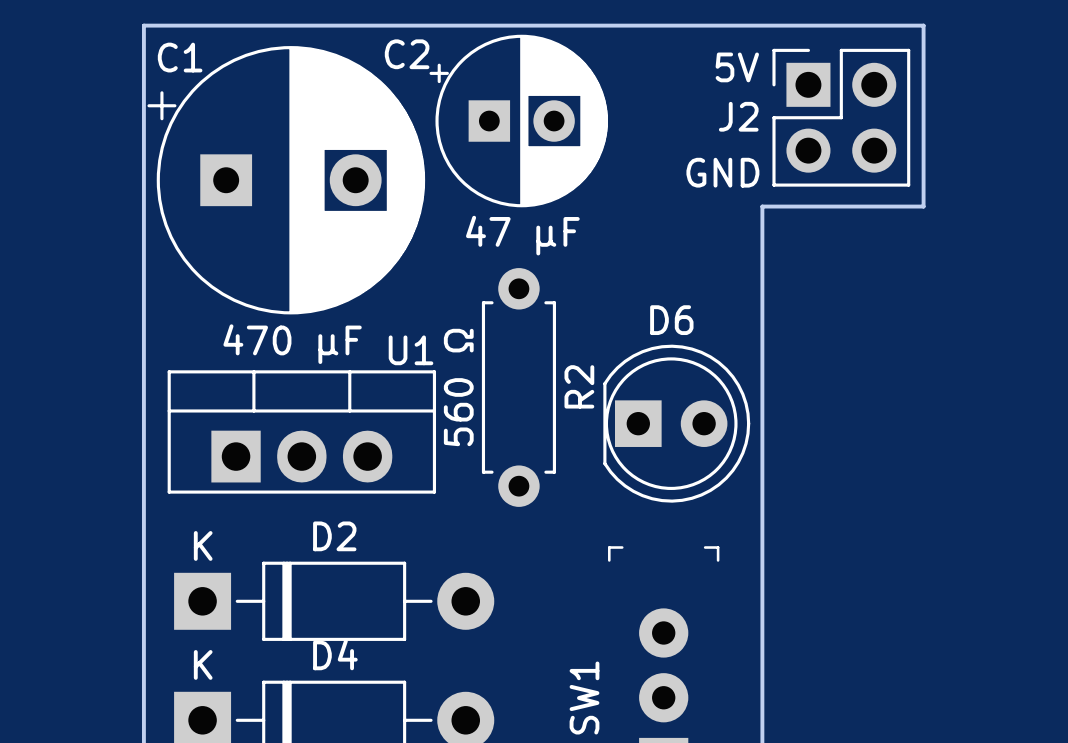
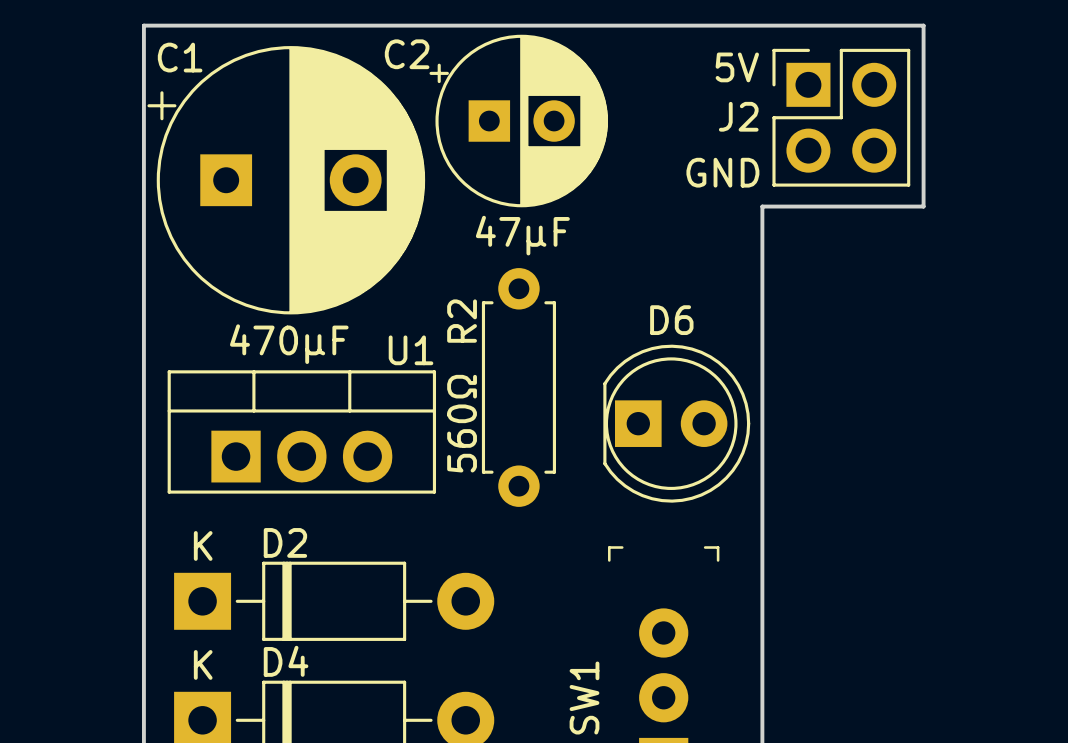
text: 47 μF (522, 235) -> 47μF (522, 235)
text: 470 μF (292, 344) -> 470μF (289, 344)
R2 name position: R2 (579, 386) -> R2 (462, 321)
text: 560 Ω (458, 387) -> 560Ω (462, 423)
D2 name position: D2 (334, 536) -> D2 (285, 542)
D4 name position: D4 (335, 654) -> D4 (286, 661)

